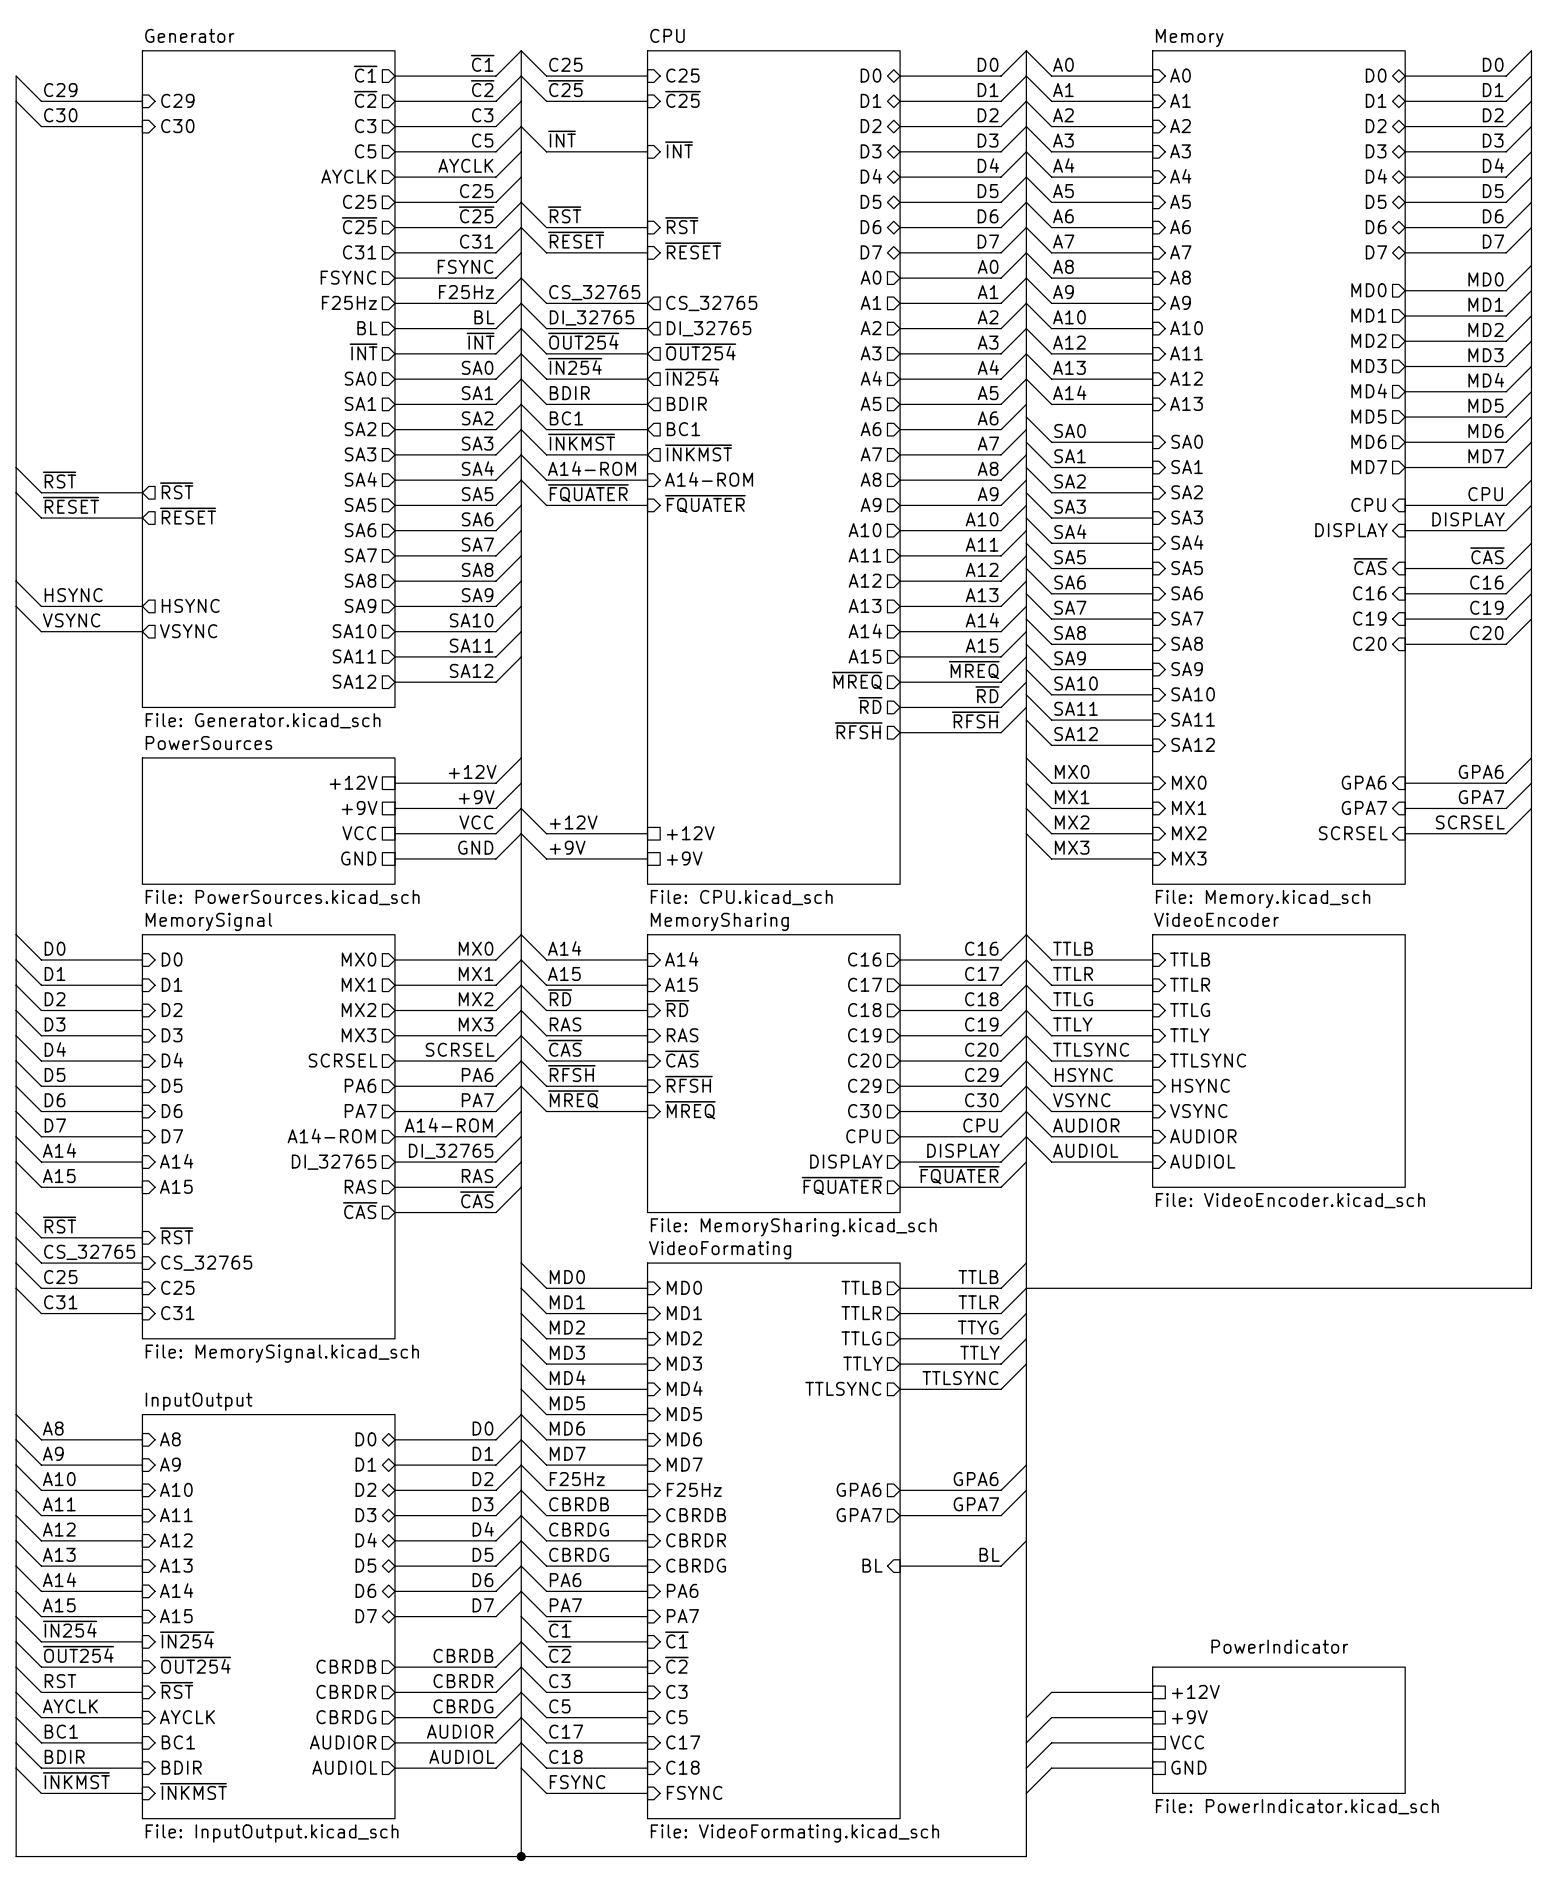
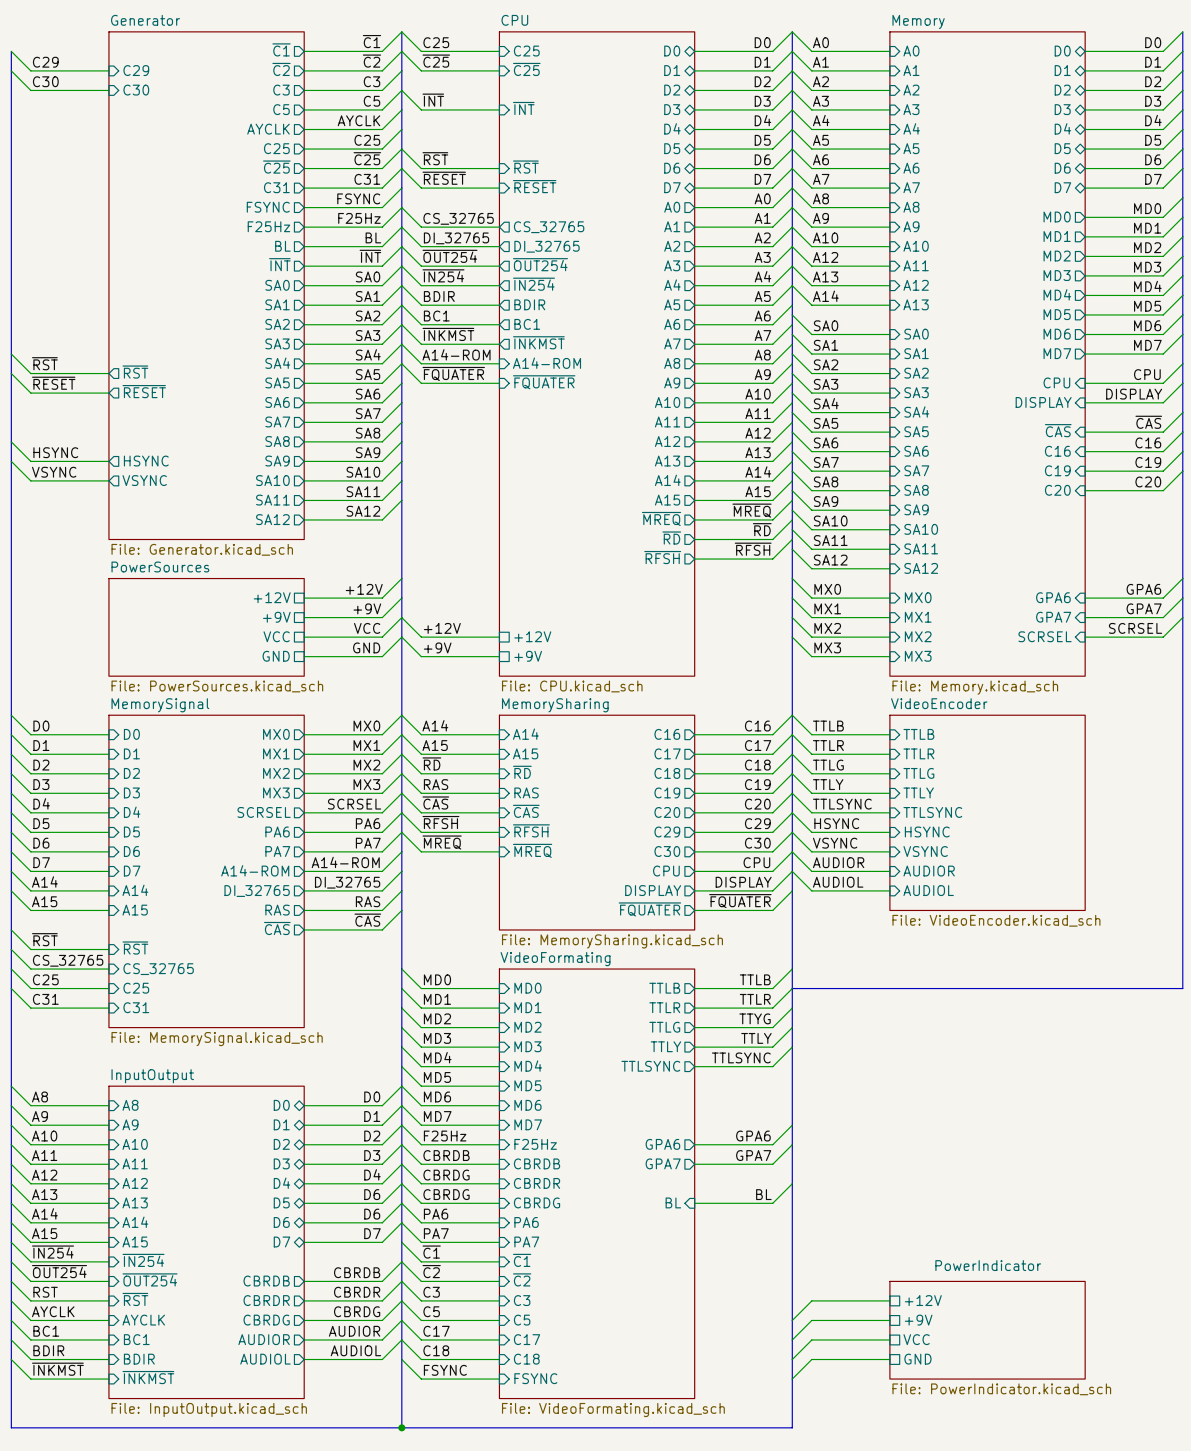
label: D5 (482, 1554) -> D6 (372, 1194)

